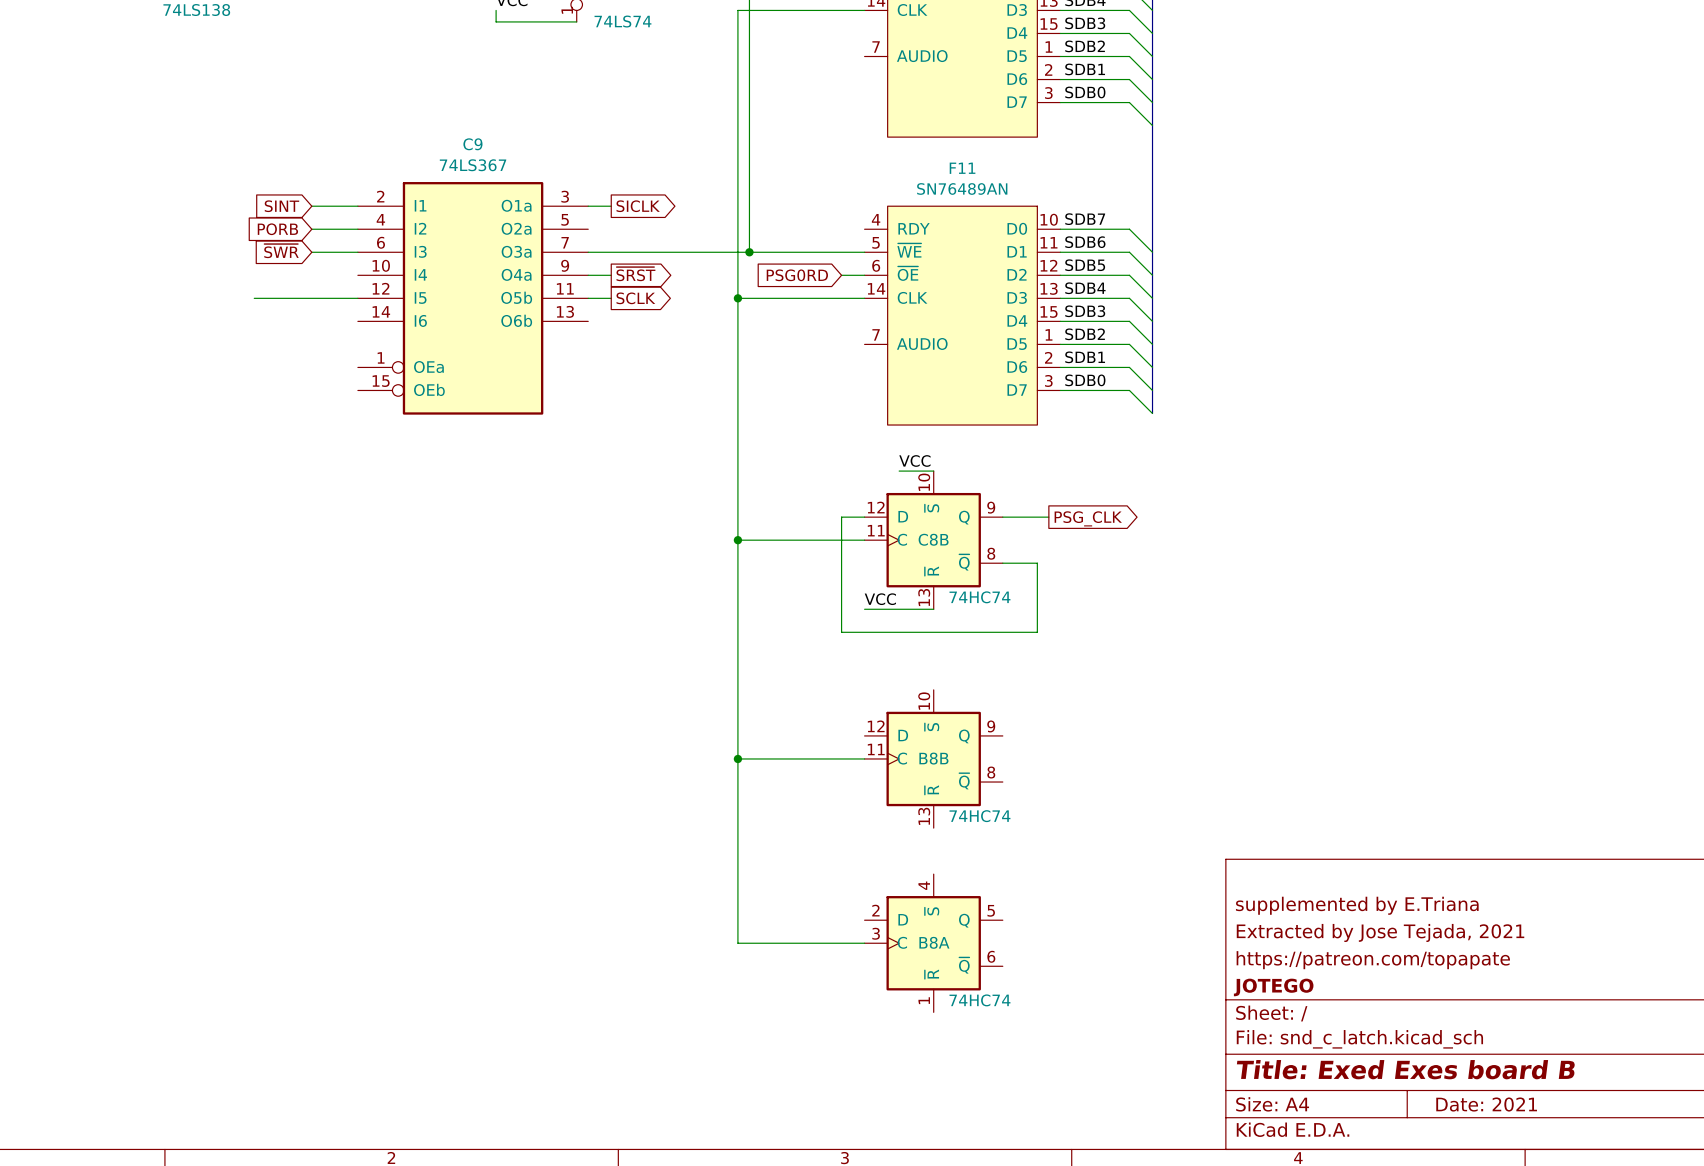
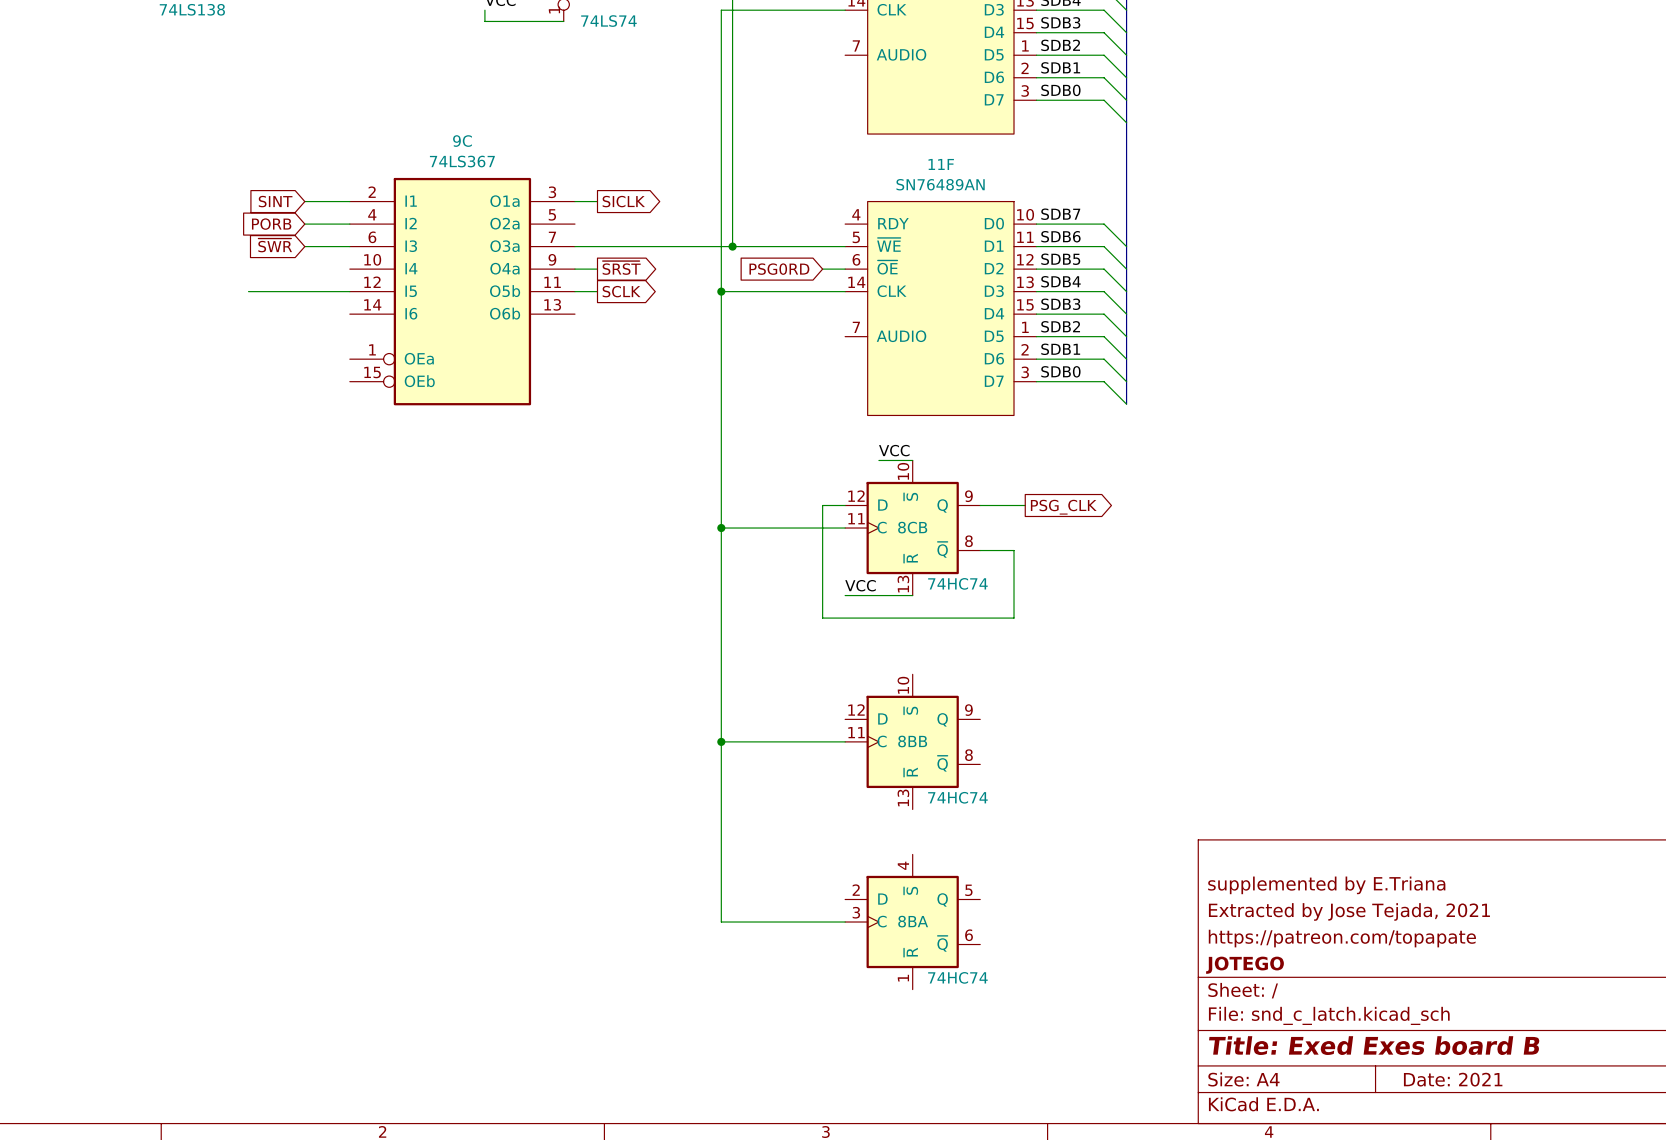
C9 name: C9 (472, 144) -> 9C (462, 141)
F11 name: F11 (962, 168) -> 11F (941, 164)
C8B name: C8B (933, 539) -> 8CB (912, 527)
B8B name: B8B (933, 758) -> 8BB (912, 741)
B8A name: B8A (934, 942) -> 8BA (913, 921)

